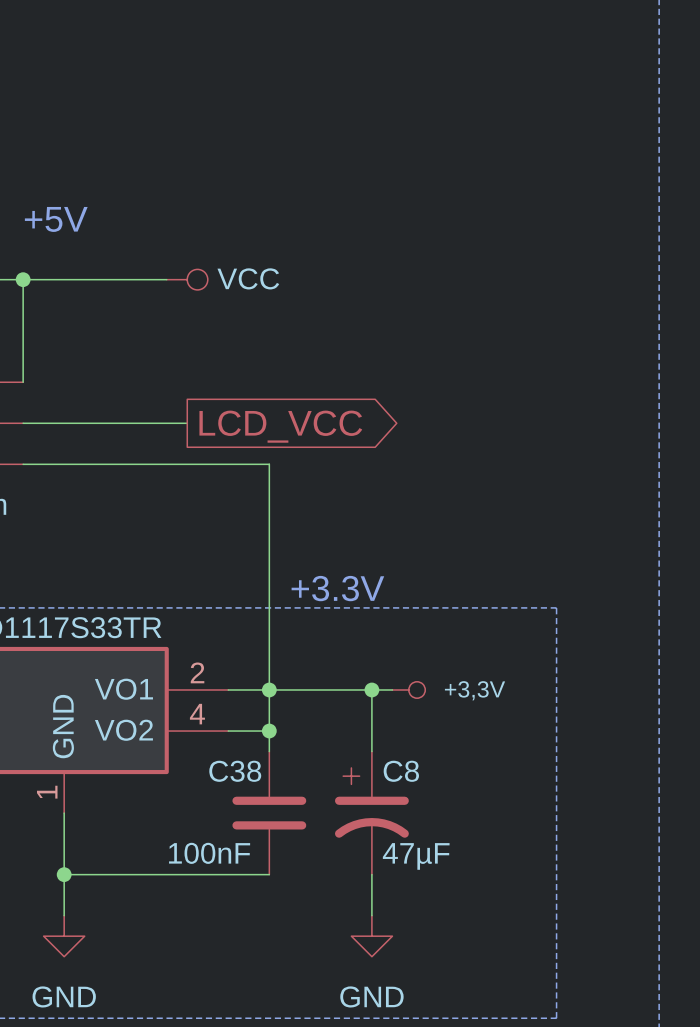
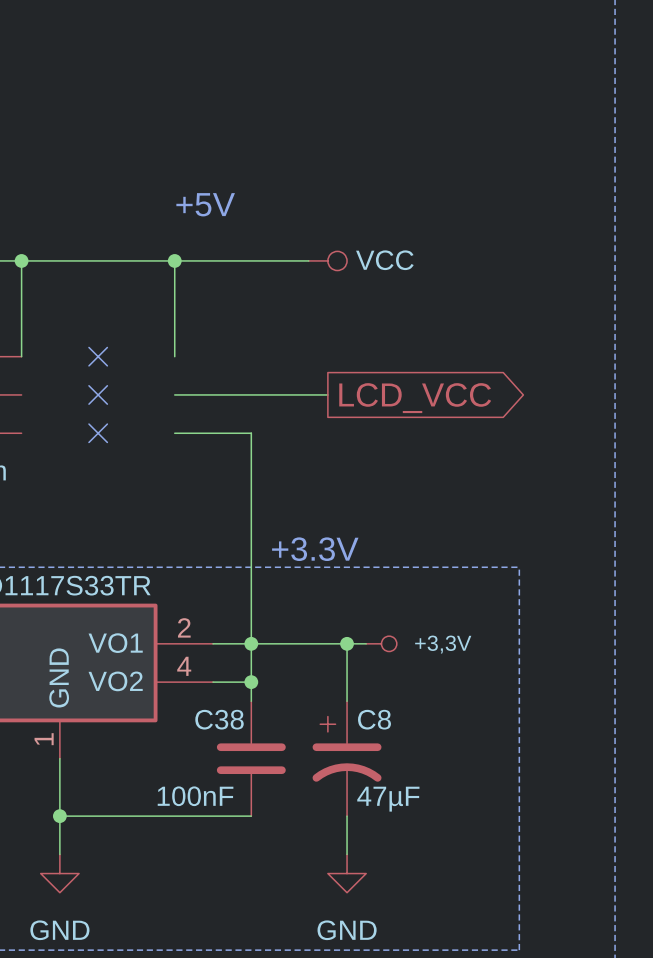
text position: +5V (56, 219) -> +5V (205, 204)
wire: none -> (174, 260) (174, 356)
power symbol position: VCC (187, 279) -> VCC (327, 260)
junction: none -> (174, 260)
no-connect mark: none -> (98, 356)
wire: (23, 423) (187, 423) -> (327, 394) (174, 394)
no-connect mark: none -> (98, 394)
global label position: LCD_VCC (280, 426) -> LCD_VCC (415, 398)
wire: (23, 464) (187, 464) -> (155, 260) (308, 260)
no-connect mark: none -> (98, 433)

